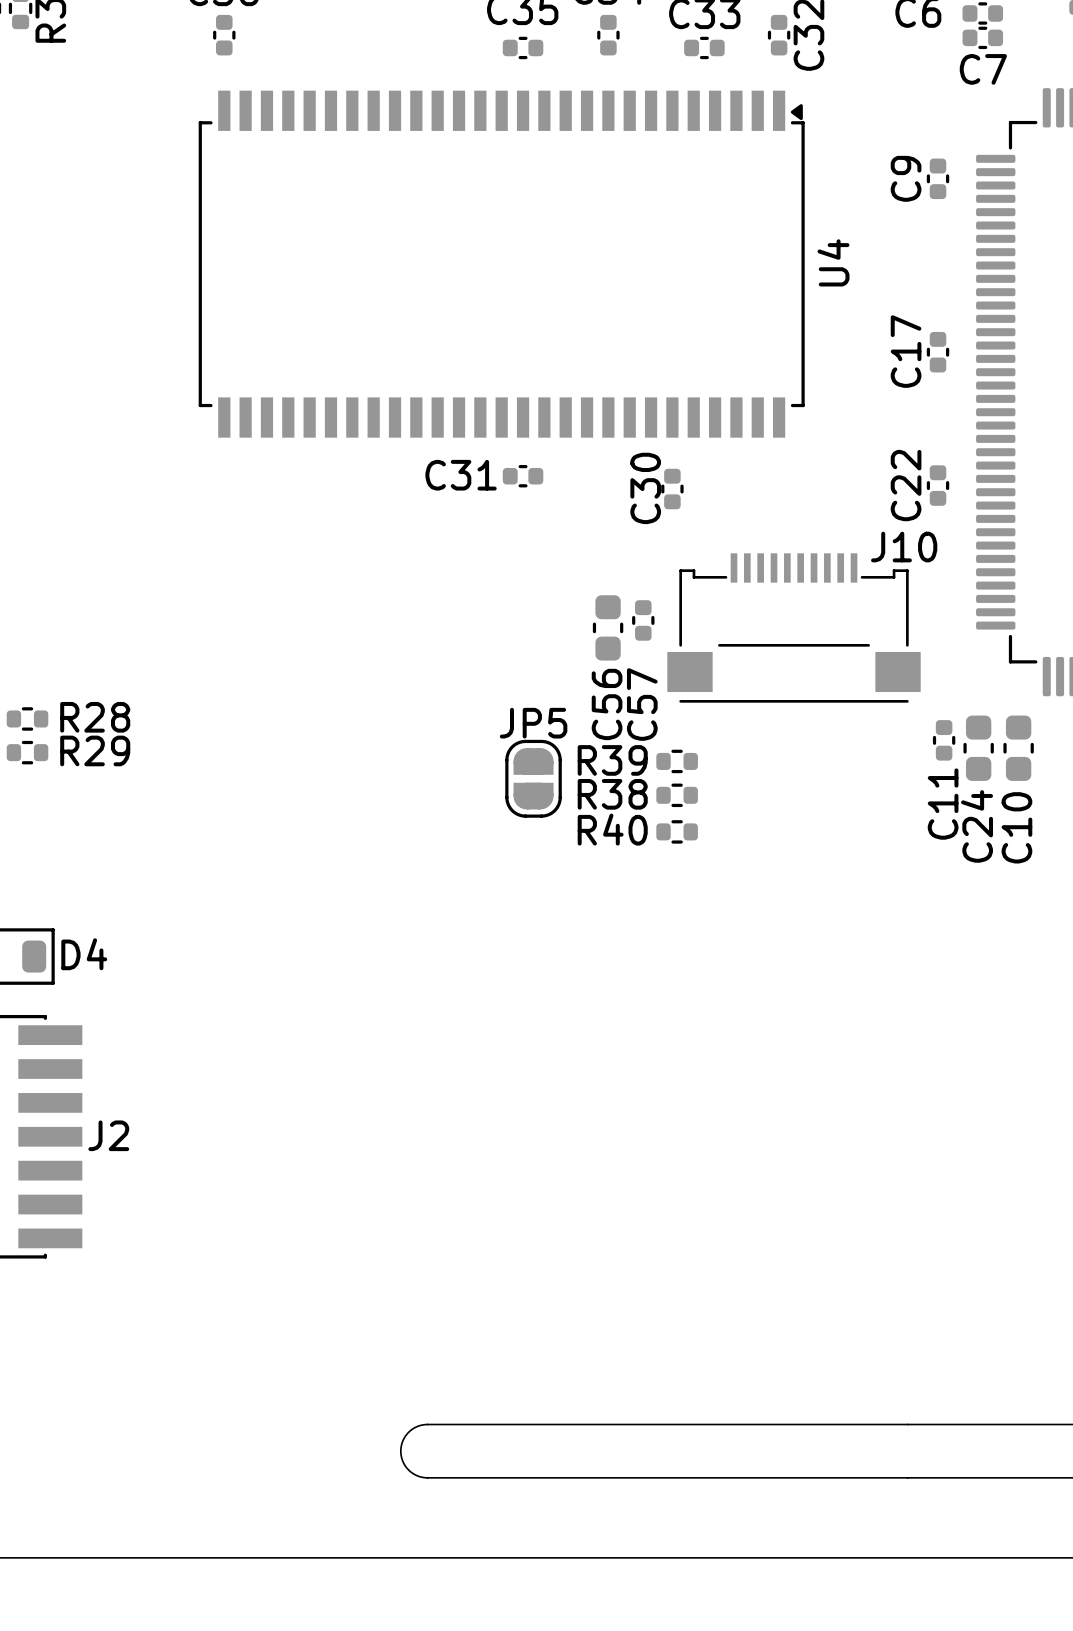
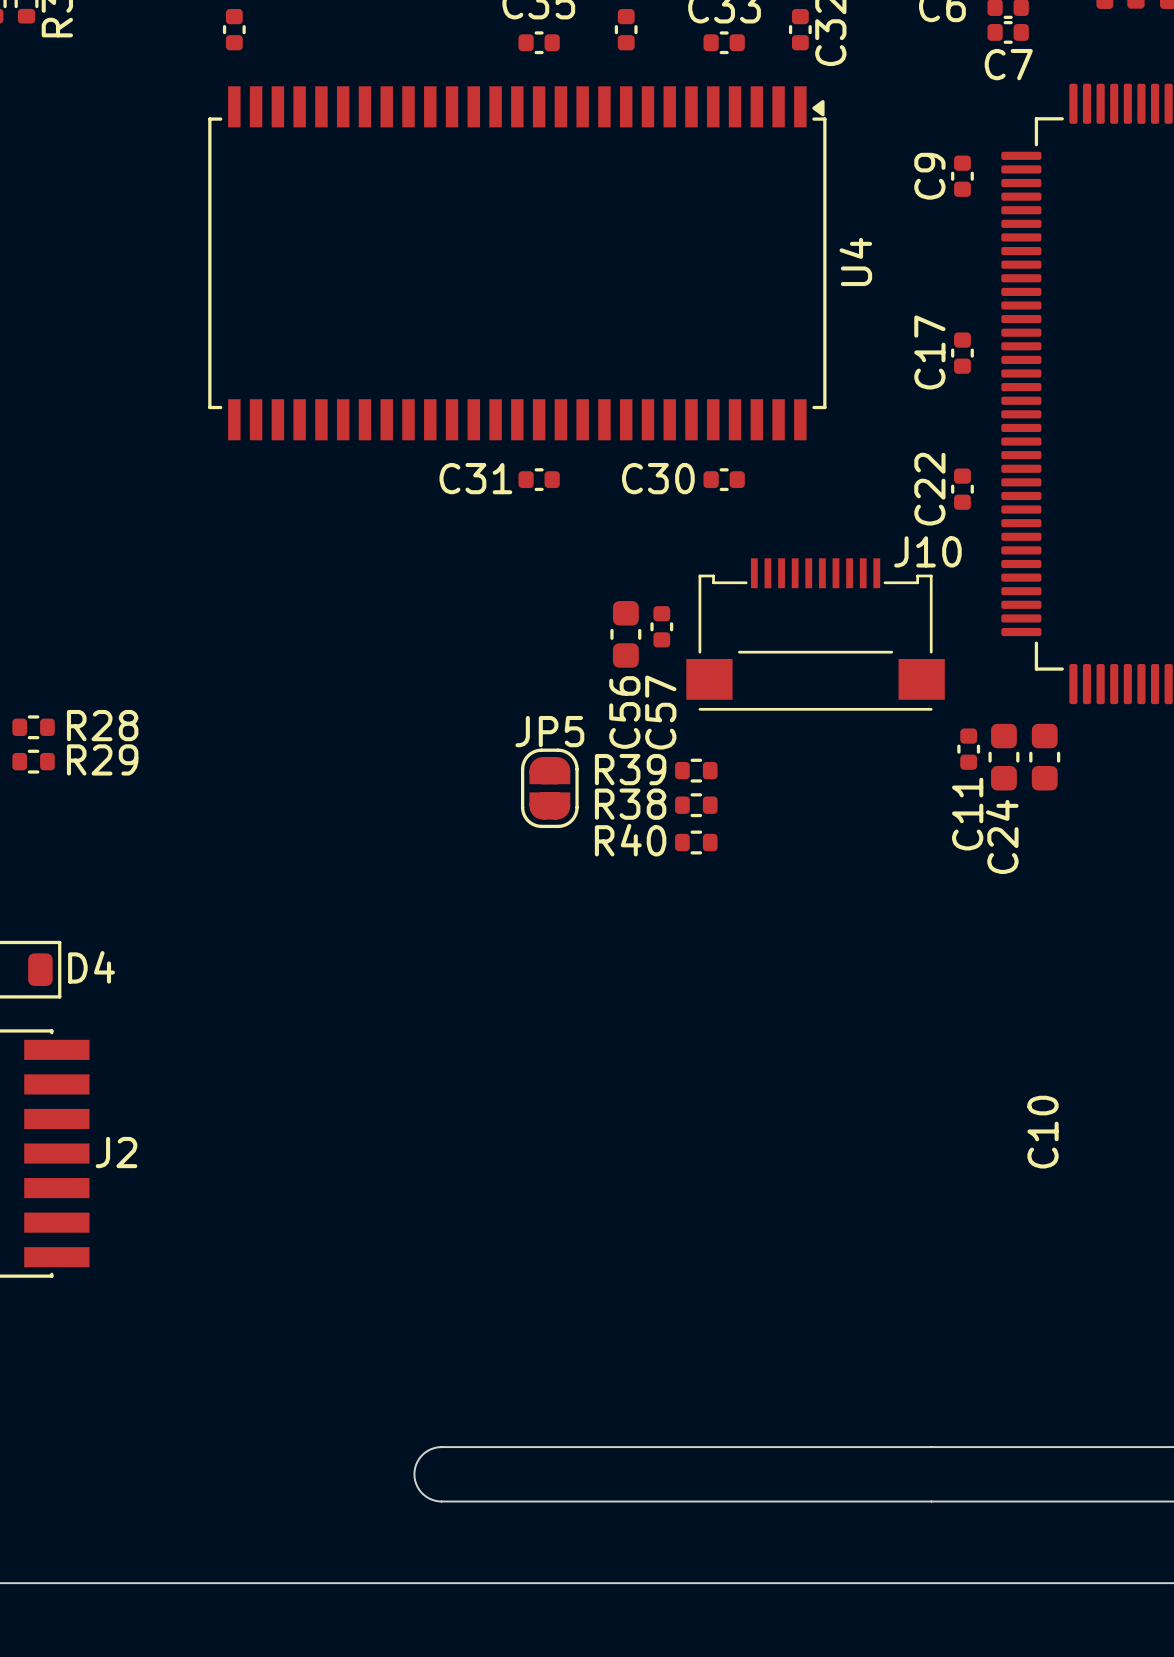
C30 rotation: 0° (672, 489) -> 90° clockwise (724, 479)
C30 position: (672, 489) -> (724, 479)
C10 name position: C10 (1016, 827) -> C10 (1043, 1132)

